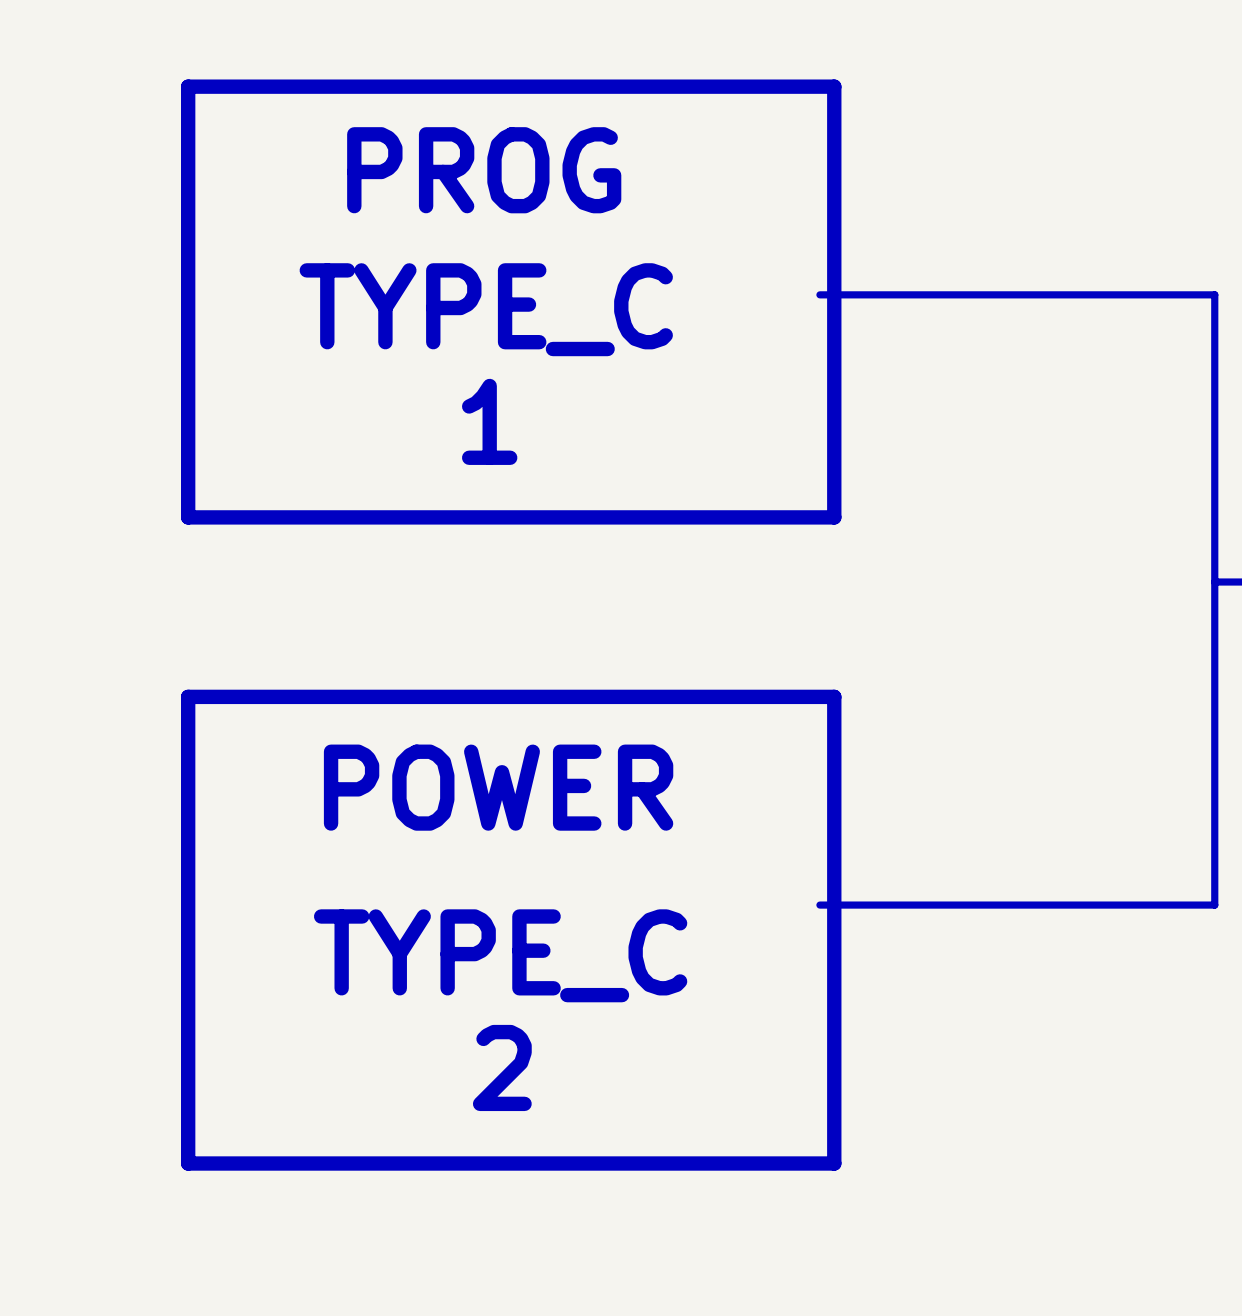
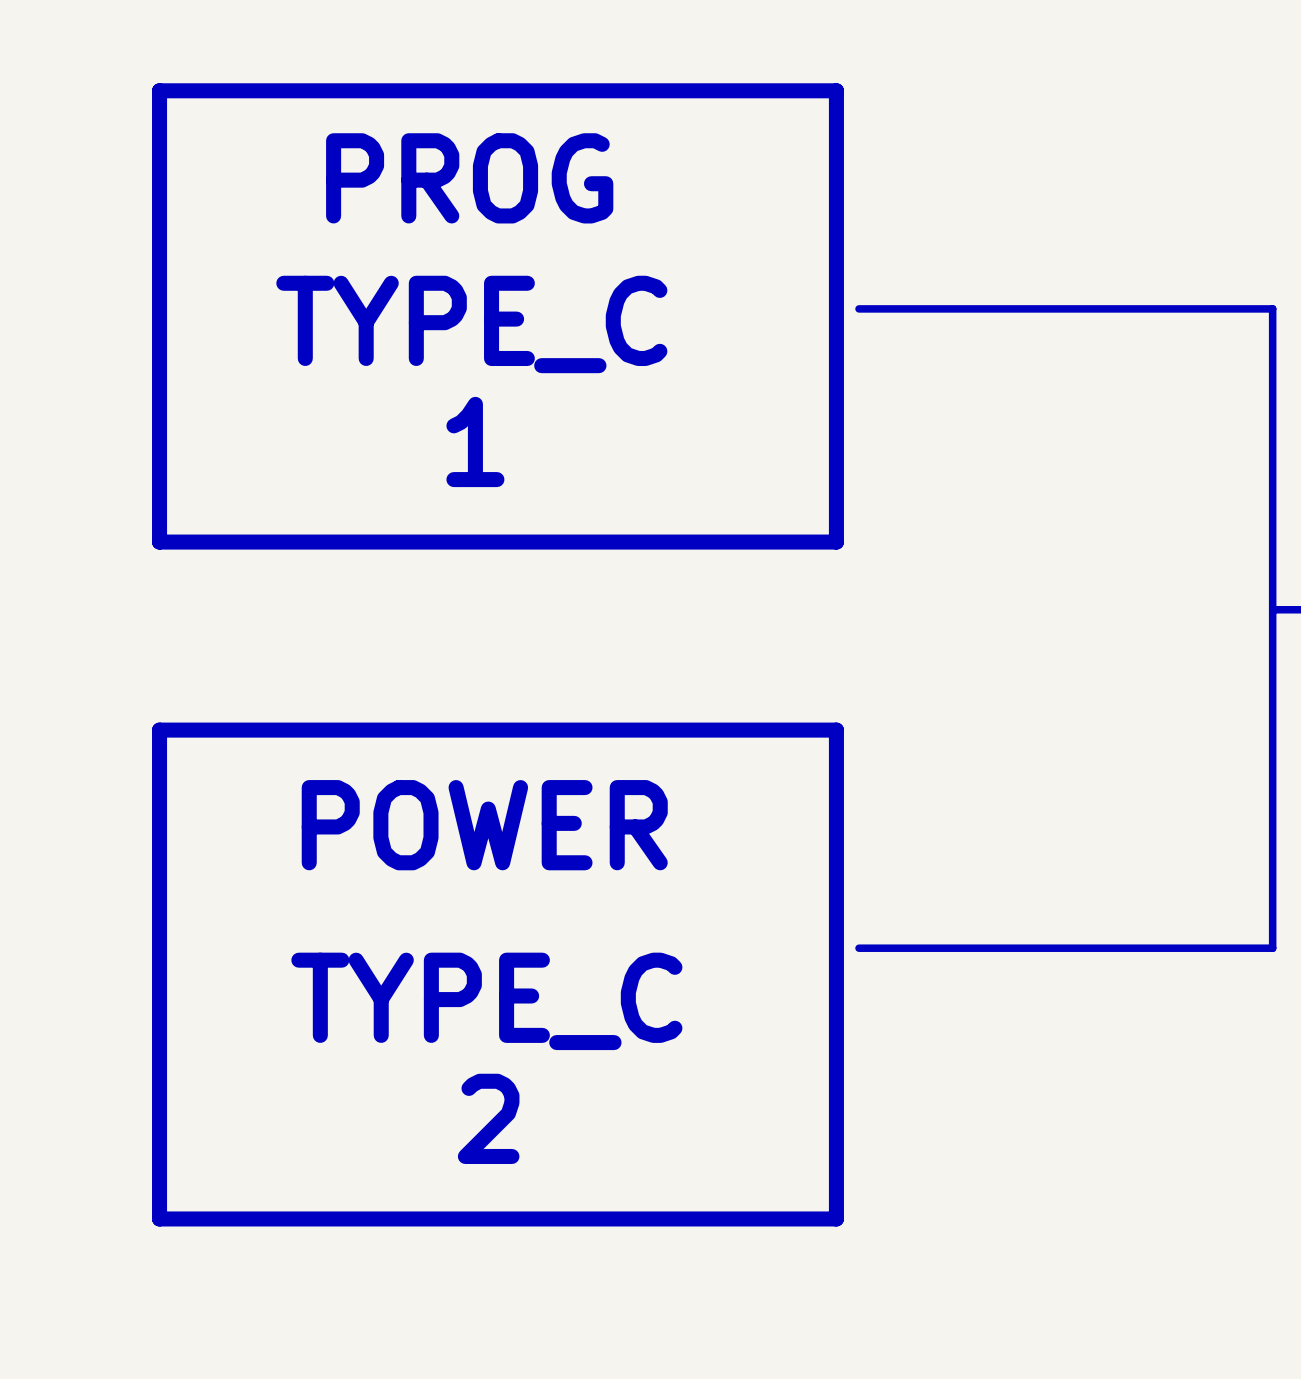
line: (188, 86) (188, 517) -> (197, 90) (159, 90) (159, 542) (197, 542)
line: (798, 86) (834, 86) (834, 517) (798, 517) -> (836, 90) (836, 542)
text position: PROG (484, 170) -> PROG (469, 178)
text position: TYPE_C (486, 309) -> TYPE_C (471, 324)
text position: 1 (489, 421) -> 1 (475, 441)
line: (188, 696) (188, 1163) -> (197, 730) (159, 730) (159, 1218) (197, 1218)
line: (798, 696) (834, 696) (834, 1163) (798, 1163) -> (836, 730) (836, 1218)
text position: POWER (498, 787) -> POWER (484, 825)
text position: TYPE_C (500, 955) -> TYPE_C (486, 1001)
text position: 2 (502, 1067) -> 2 (488, 1118)

